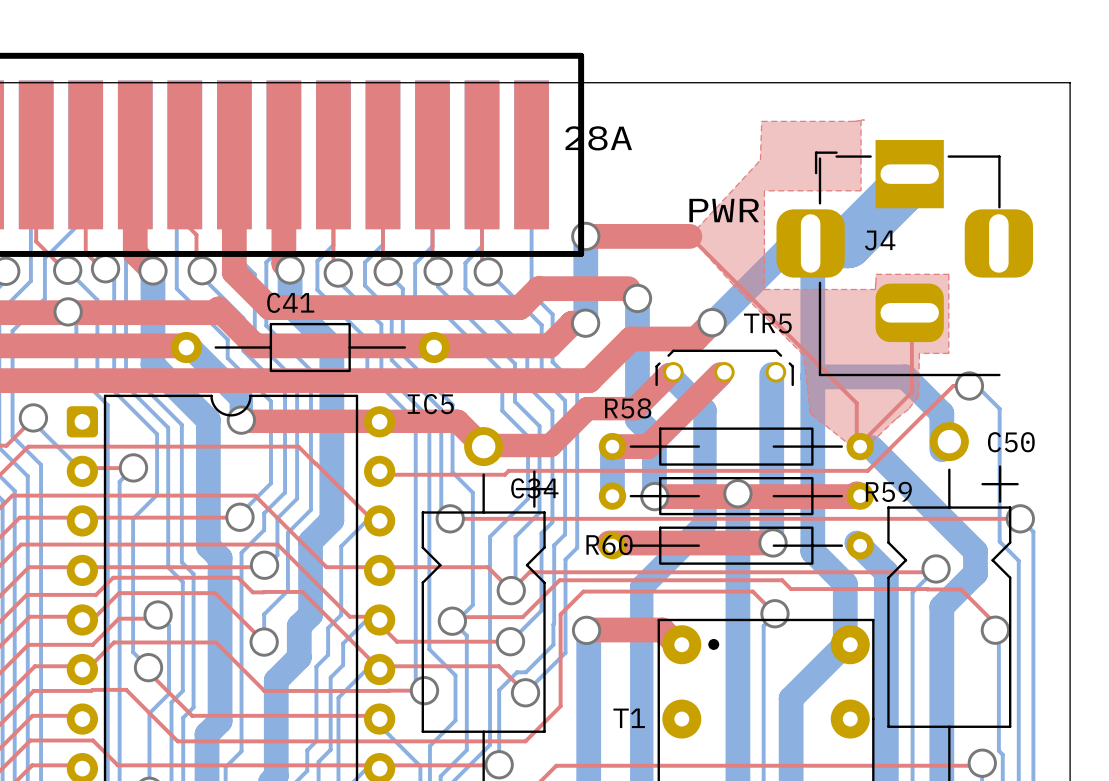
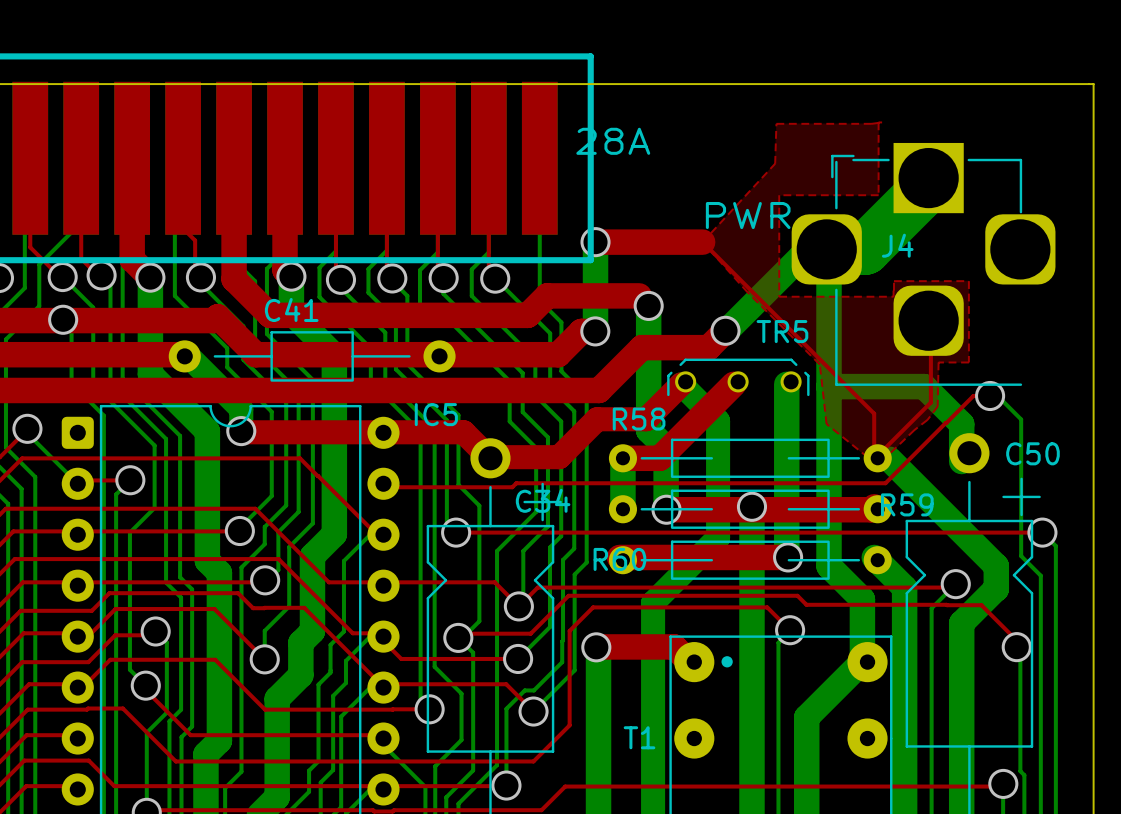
J4 footprint: [776, 139, 1034, 377] -> [791, 142, 1056, 386]

